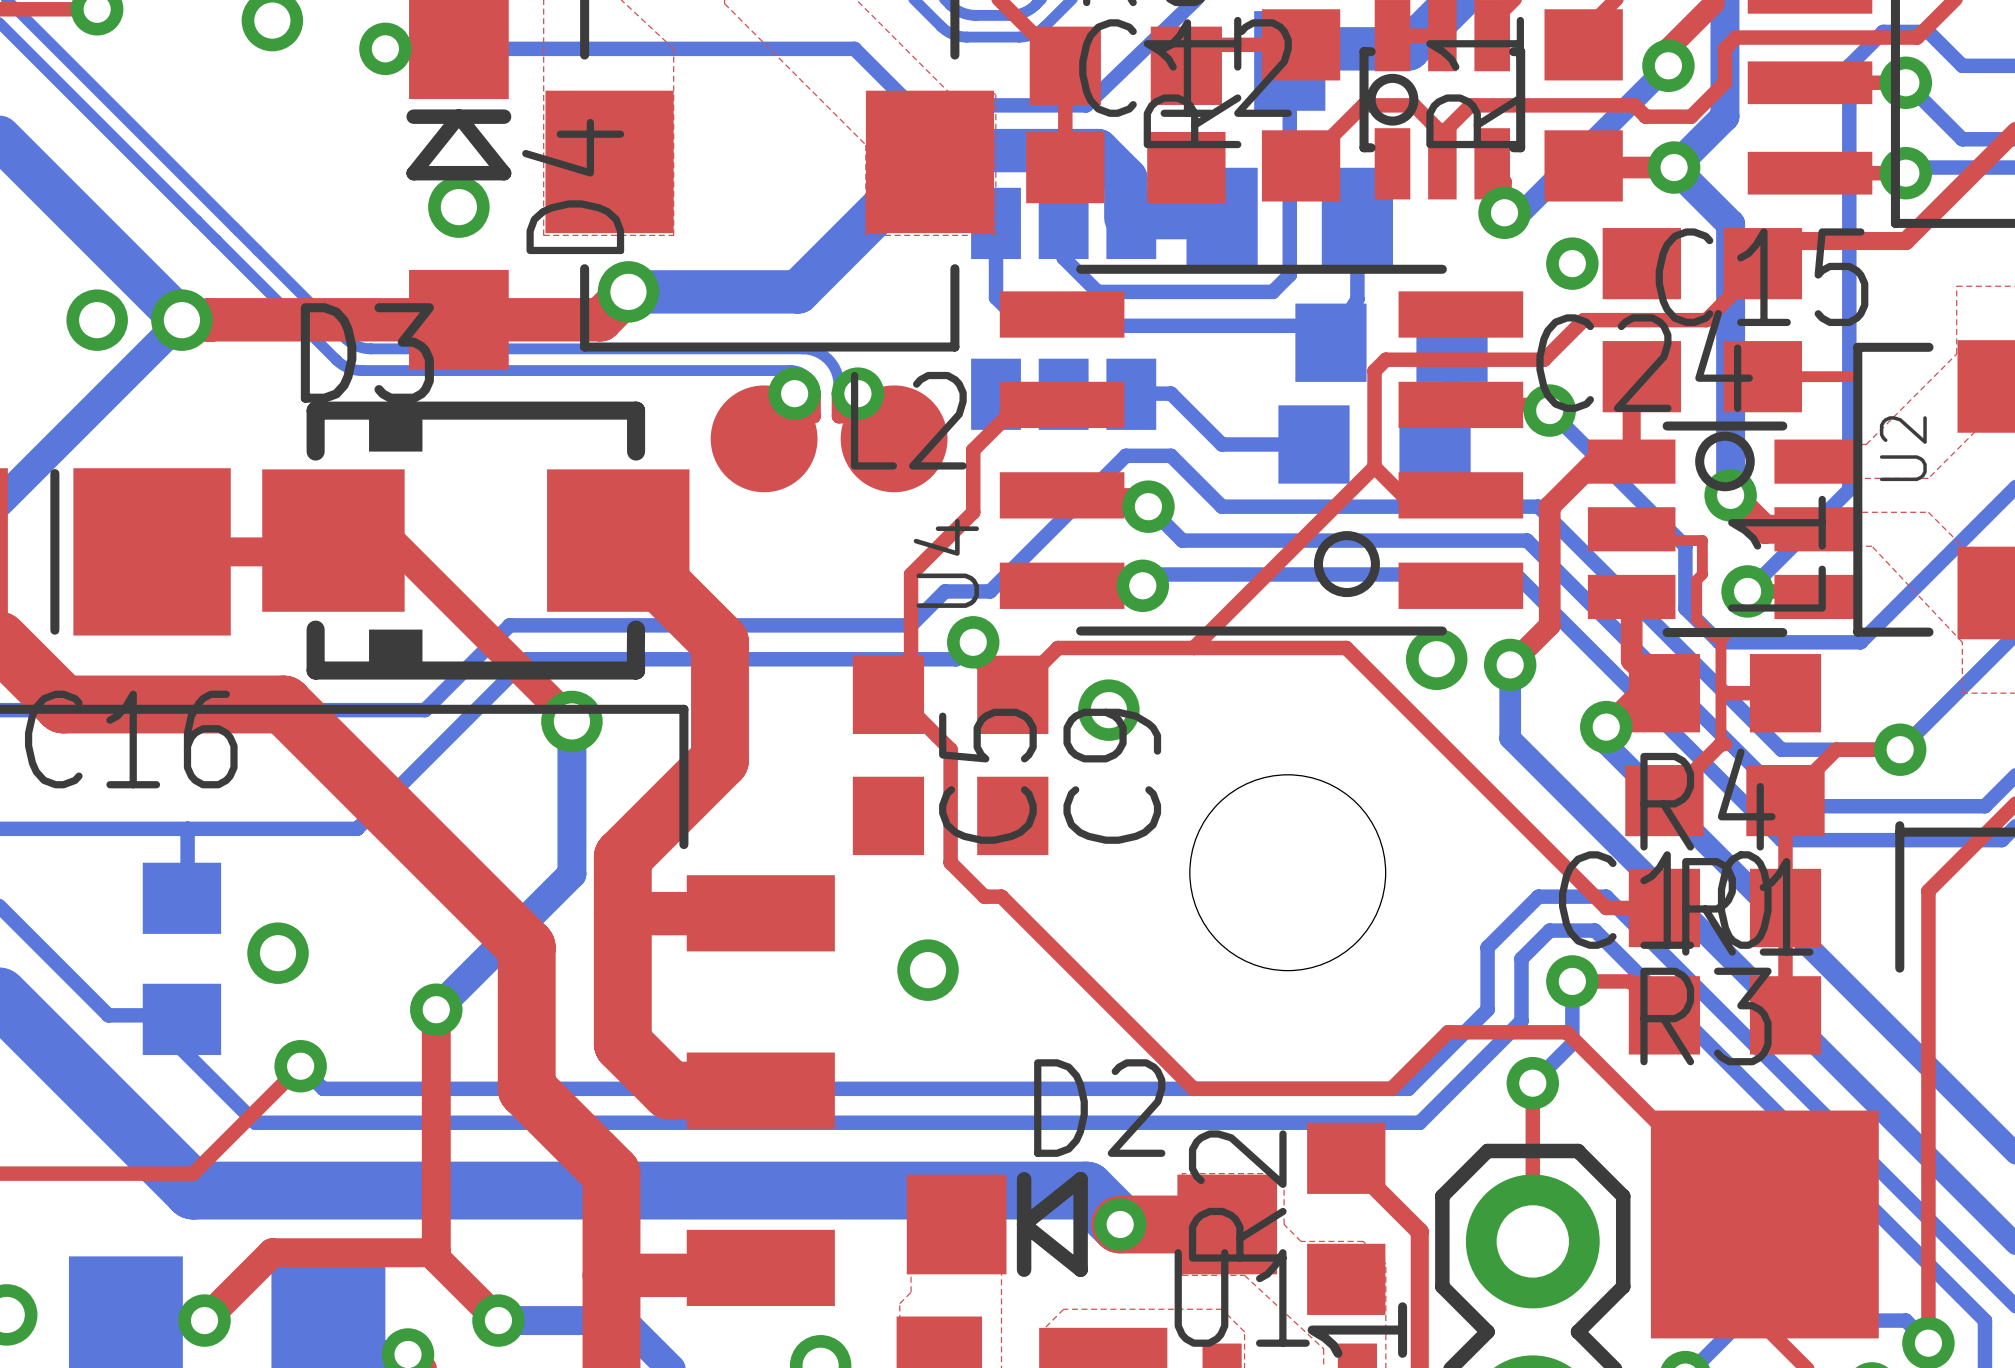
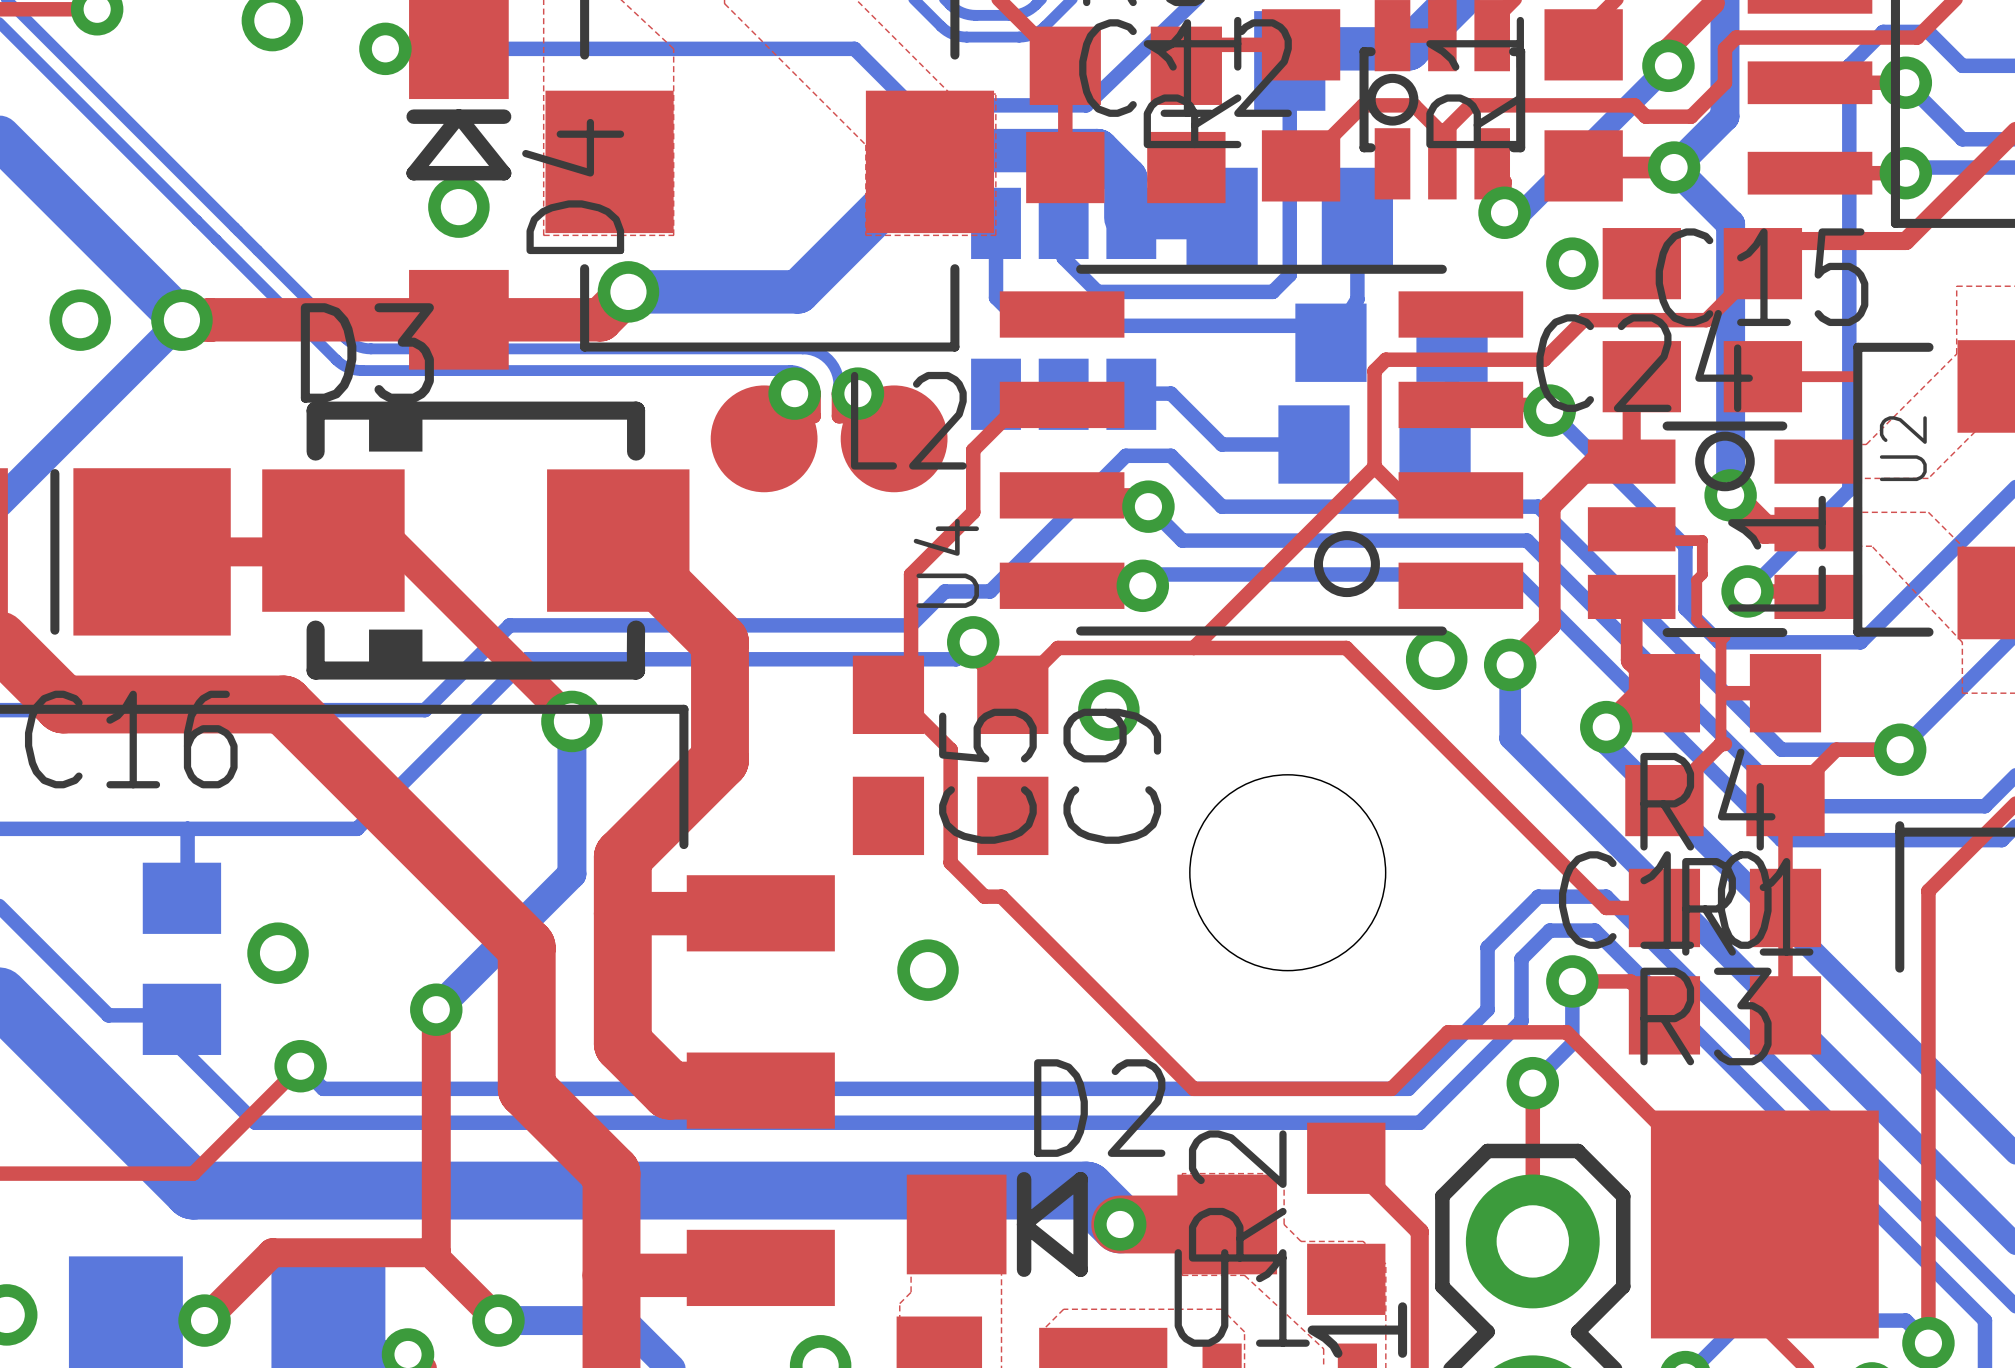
via position: (97, 320) -> (80, 320)

